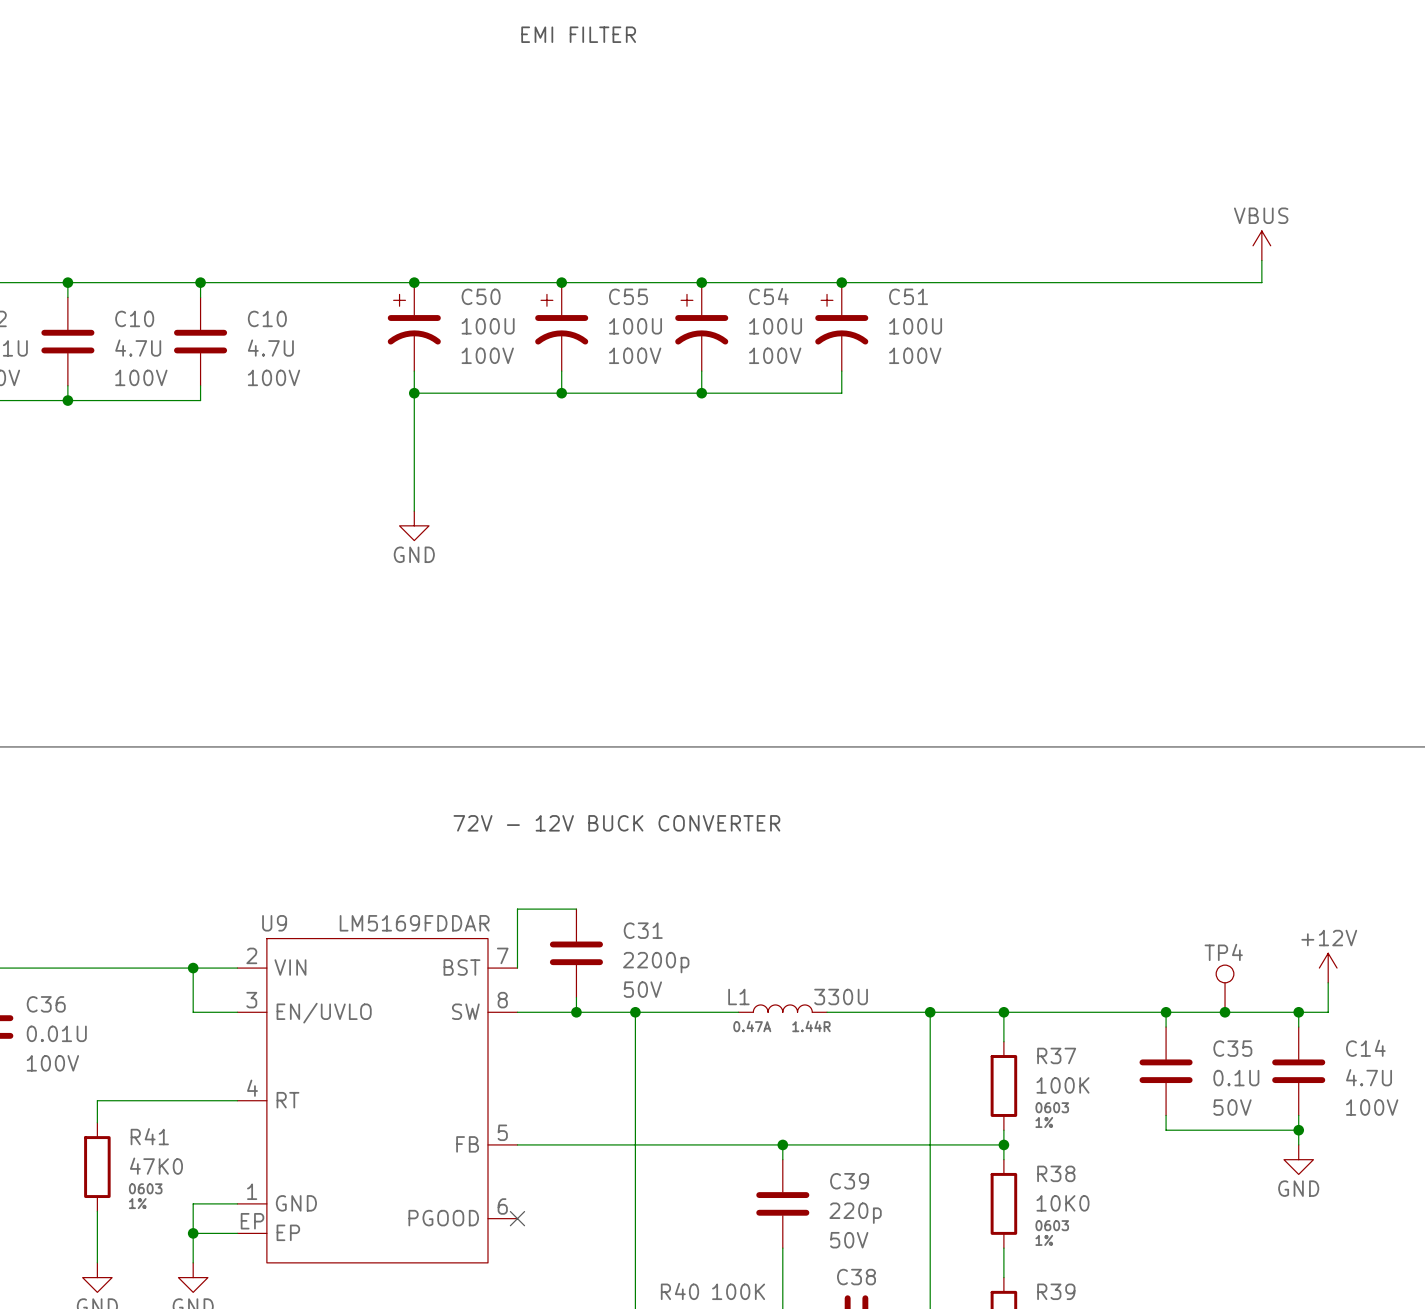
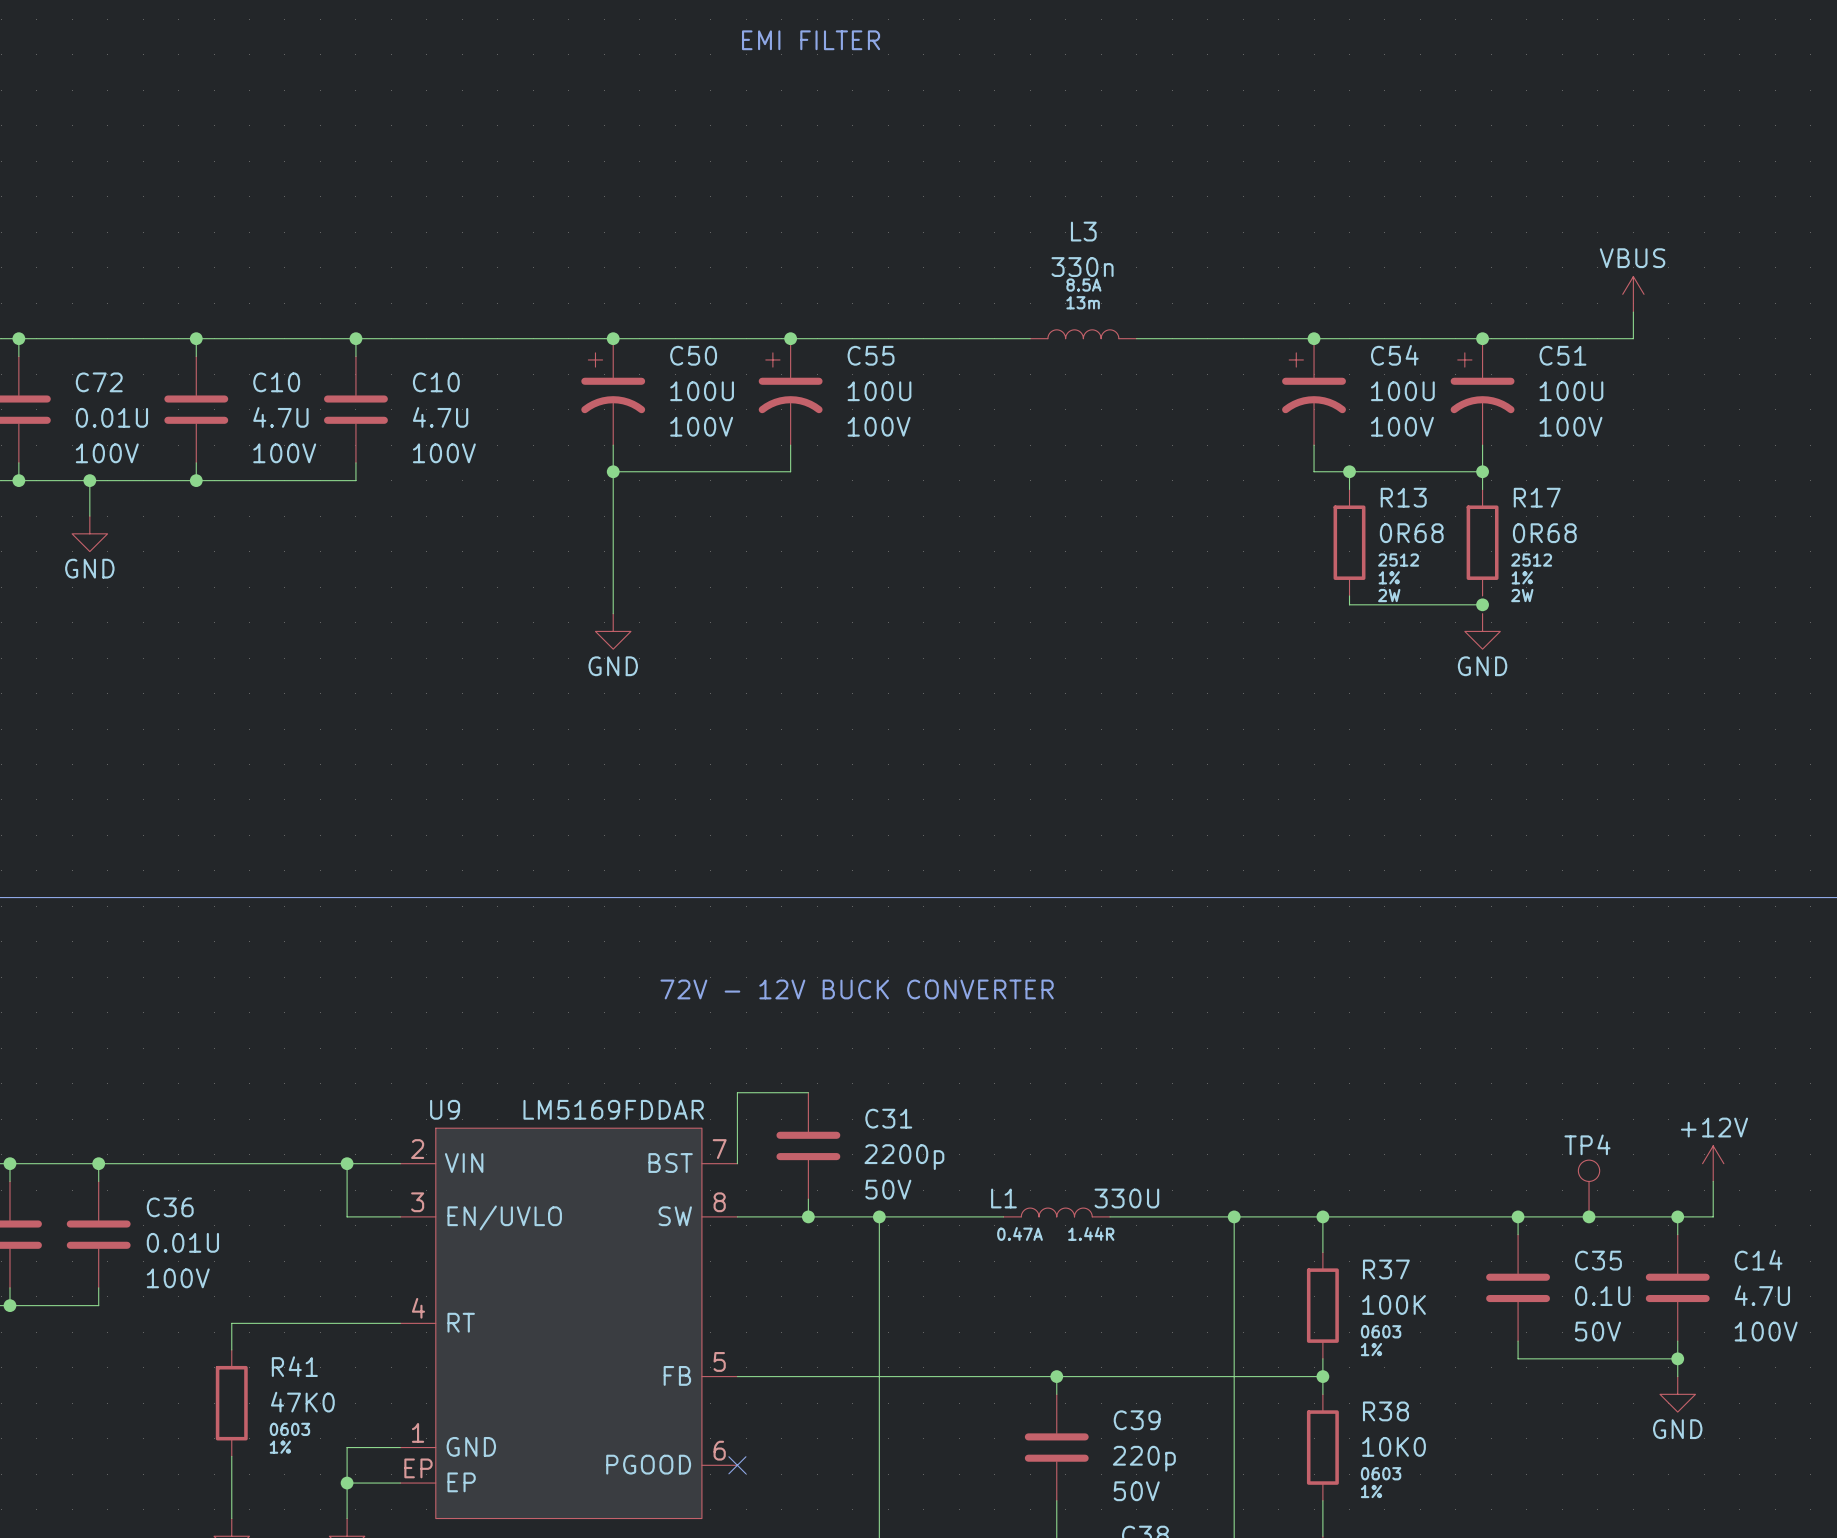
L3: none -> 330n (1083, 334)
junction: (701, 282) -> none
wire: (760, 282) (849, 282) -> none
junction: (841, 282) -> none
junction: none -> (1314, 338)
junction: none -> (1482, 338)
C54 position: (701, 326) -> (1314, 391)
C51 position: (841, 326) -> (1482, 391)
wire: (701, 371) (701, 393) -> none
wire: (841, 371) (841, 393) (561, 393) -> none
wire: none -> (1314, 445) (1314, 471) (1482, 471)
wire: none -> (1482, 445) (1482, 489)
junction: (561, 393) -> none
junction: (701, 393) -> none
wire: none -> (1349, 471) (1349, 489)
junction: none -> (1349, 471)
junction: none -> (1482, 471)
R13: none -> 0R68 (1349, 542)
R17: none -> 0R68 (1482, 542)
wire: none -> (1349, 595) (1349, 604) (1482, 604)
junction: none -> (1482, 604)
power symbol: none -> GND (1482, 631)

